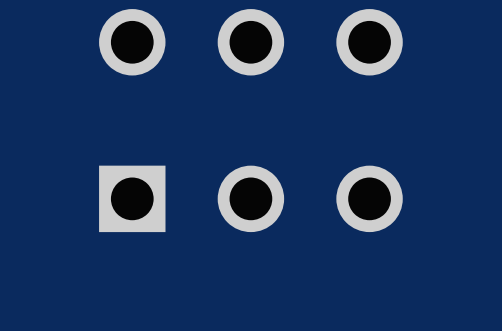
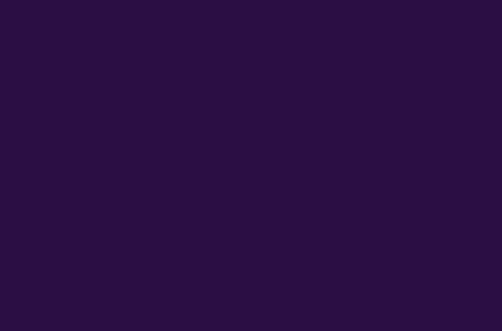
part: (250, 120) -> none

